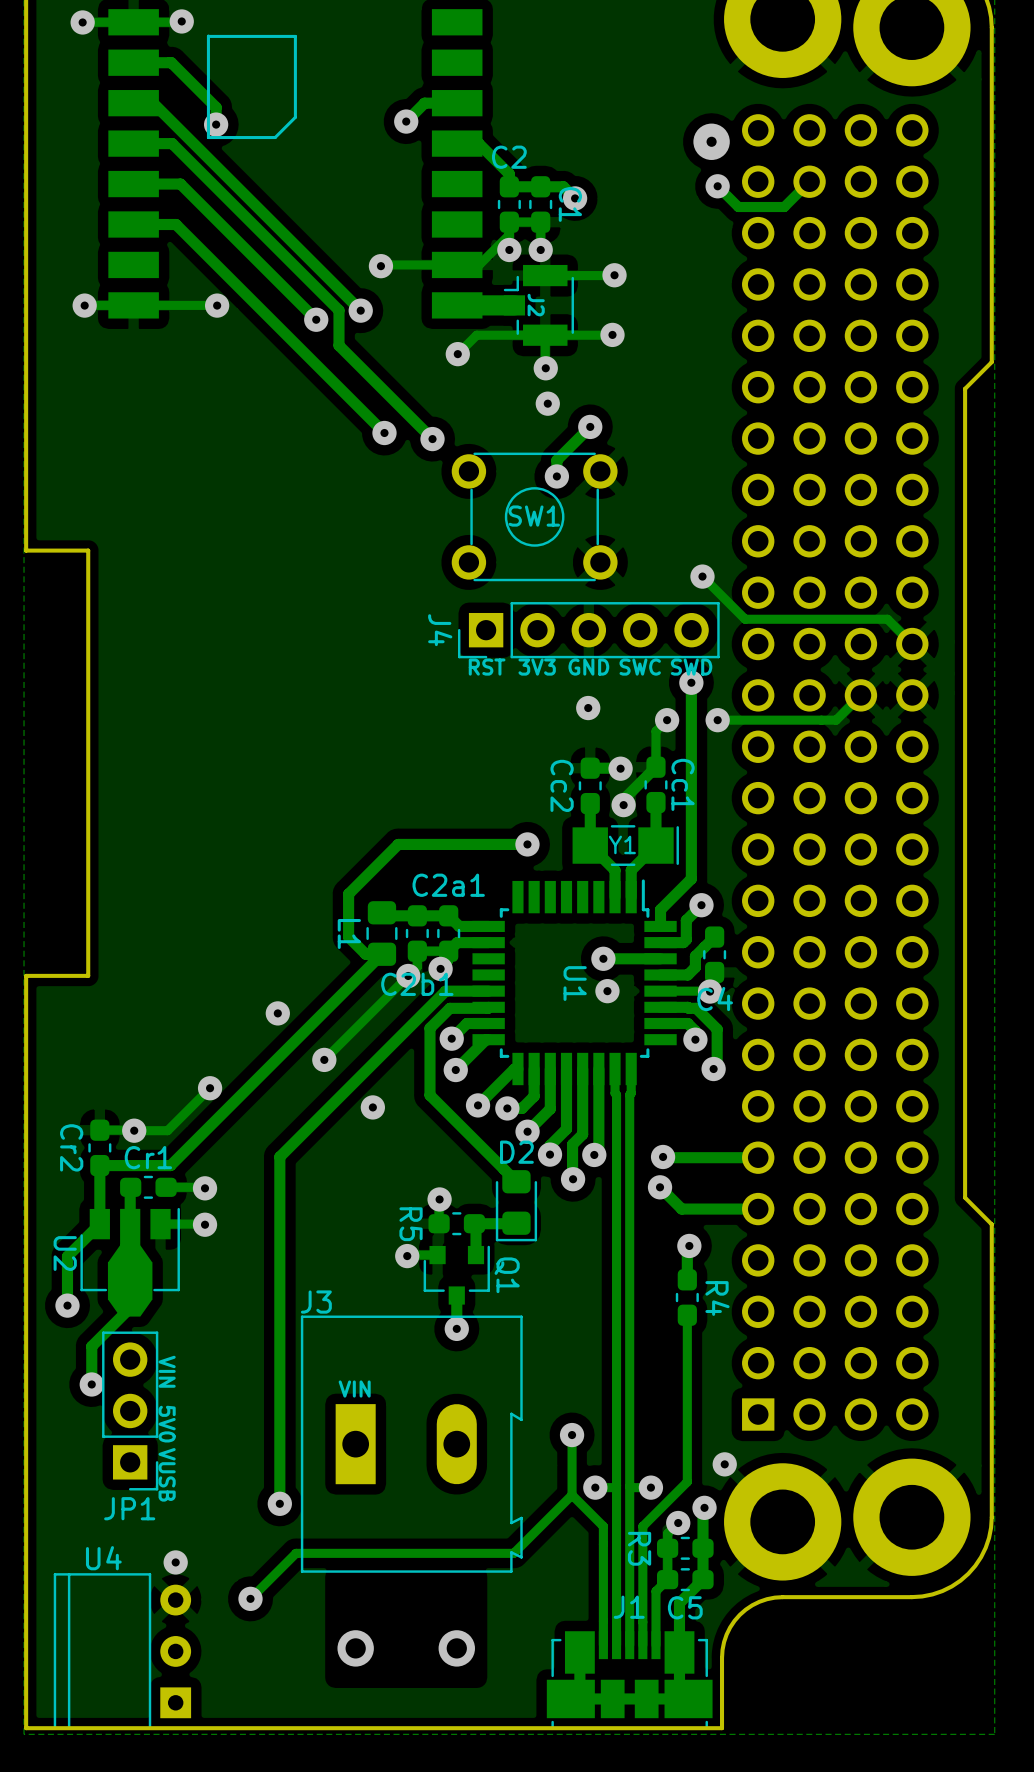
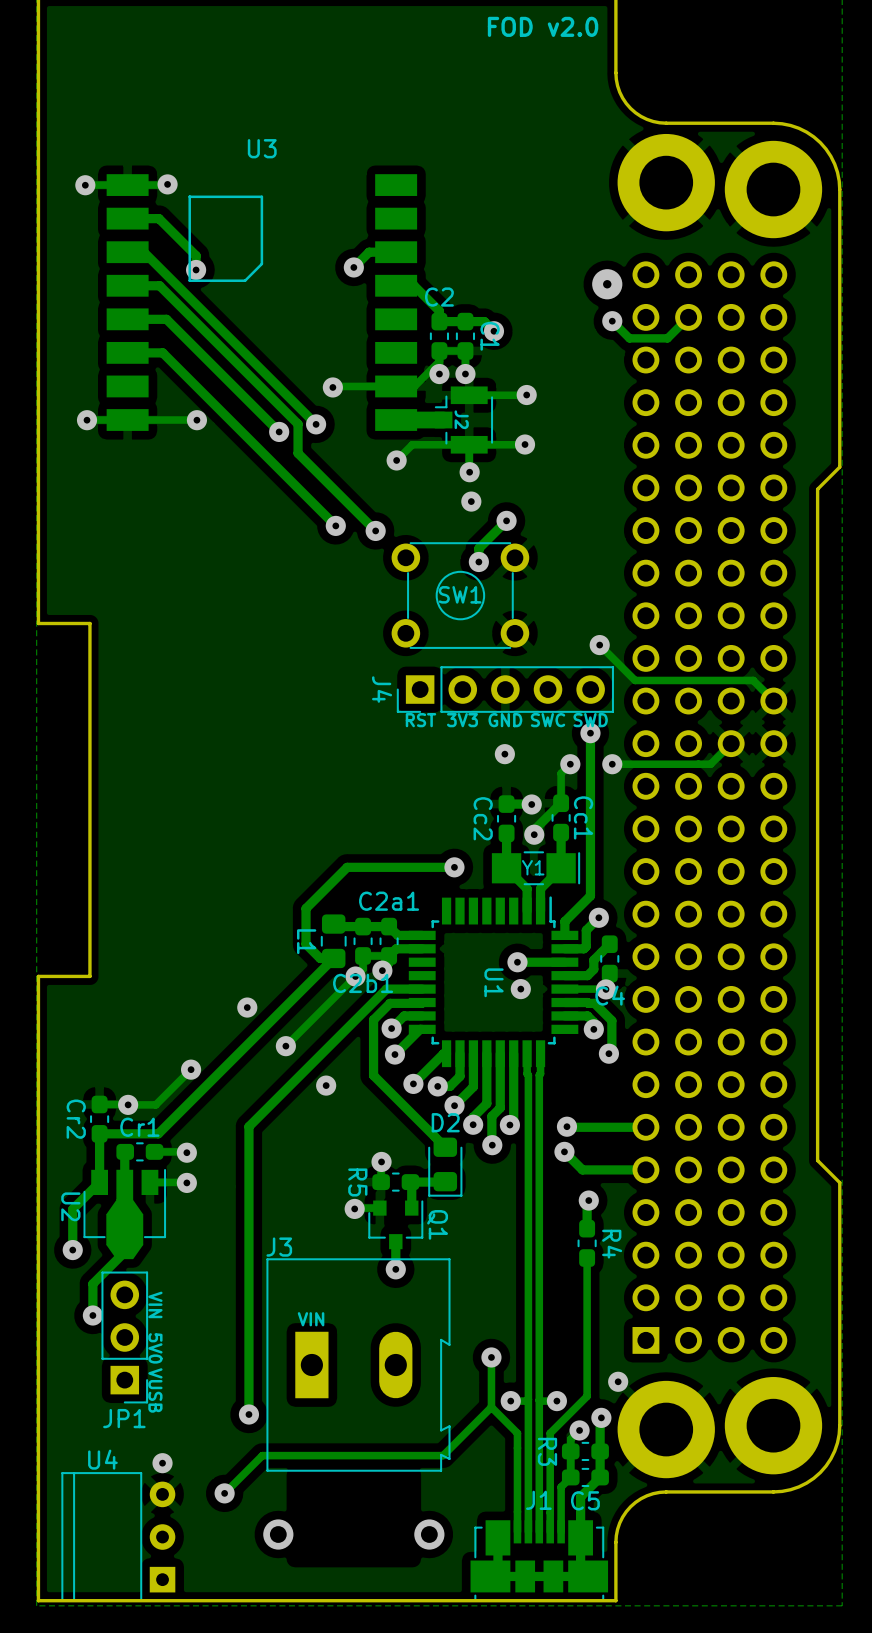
via position: (355, 1648) -> (278, 1534)
via position: (456, 1648) -> (429, 1534)

